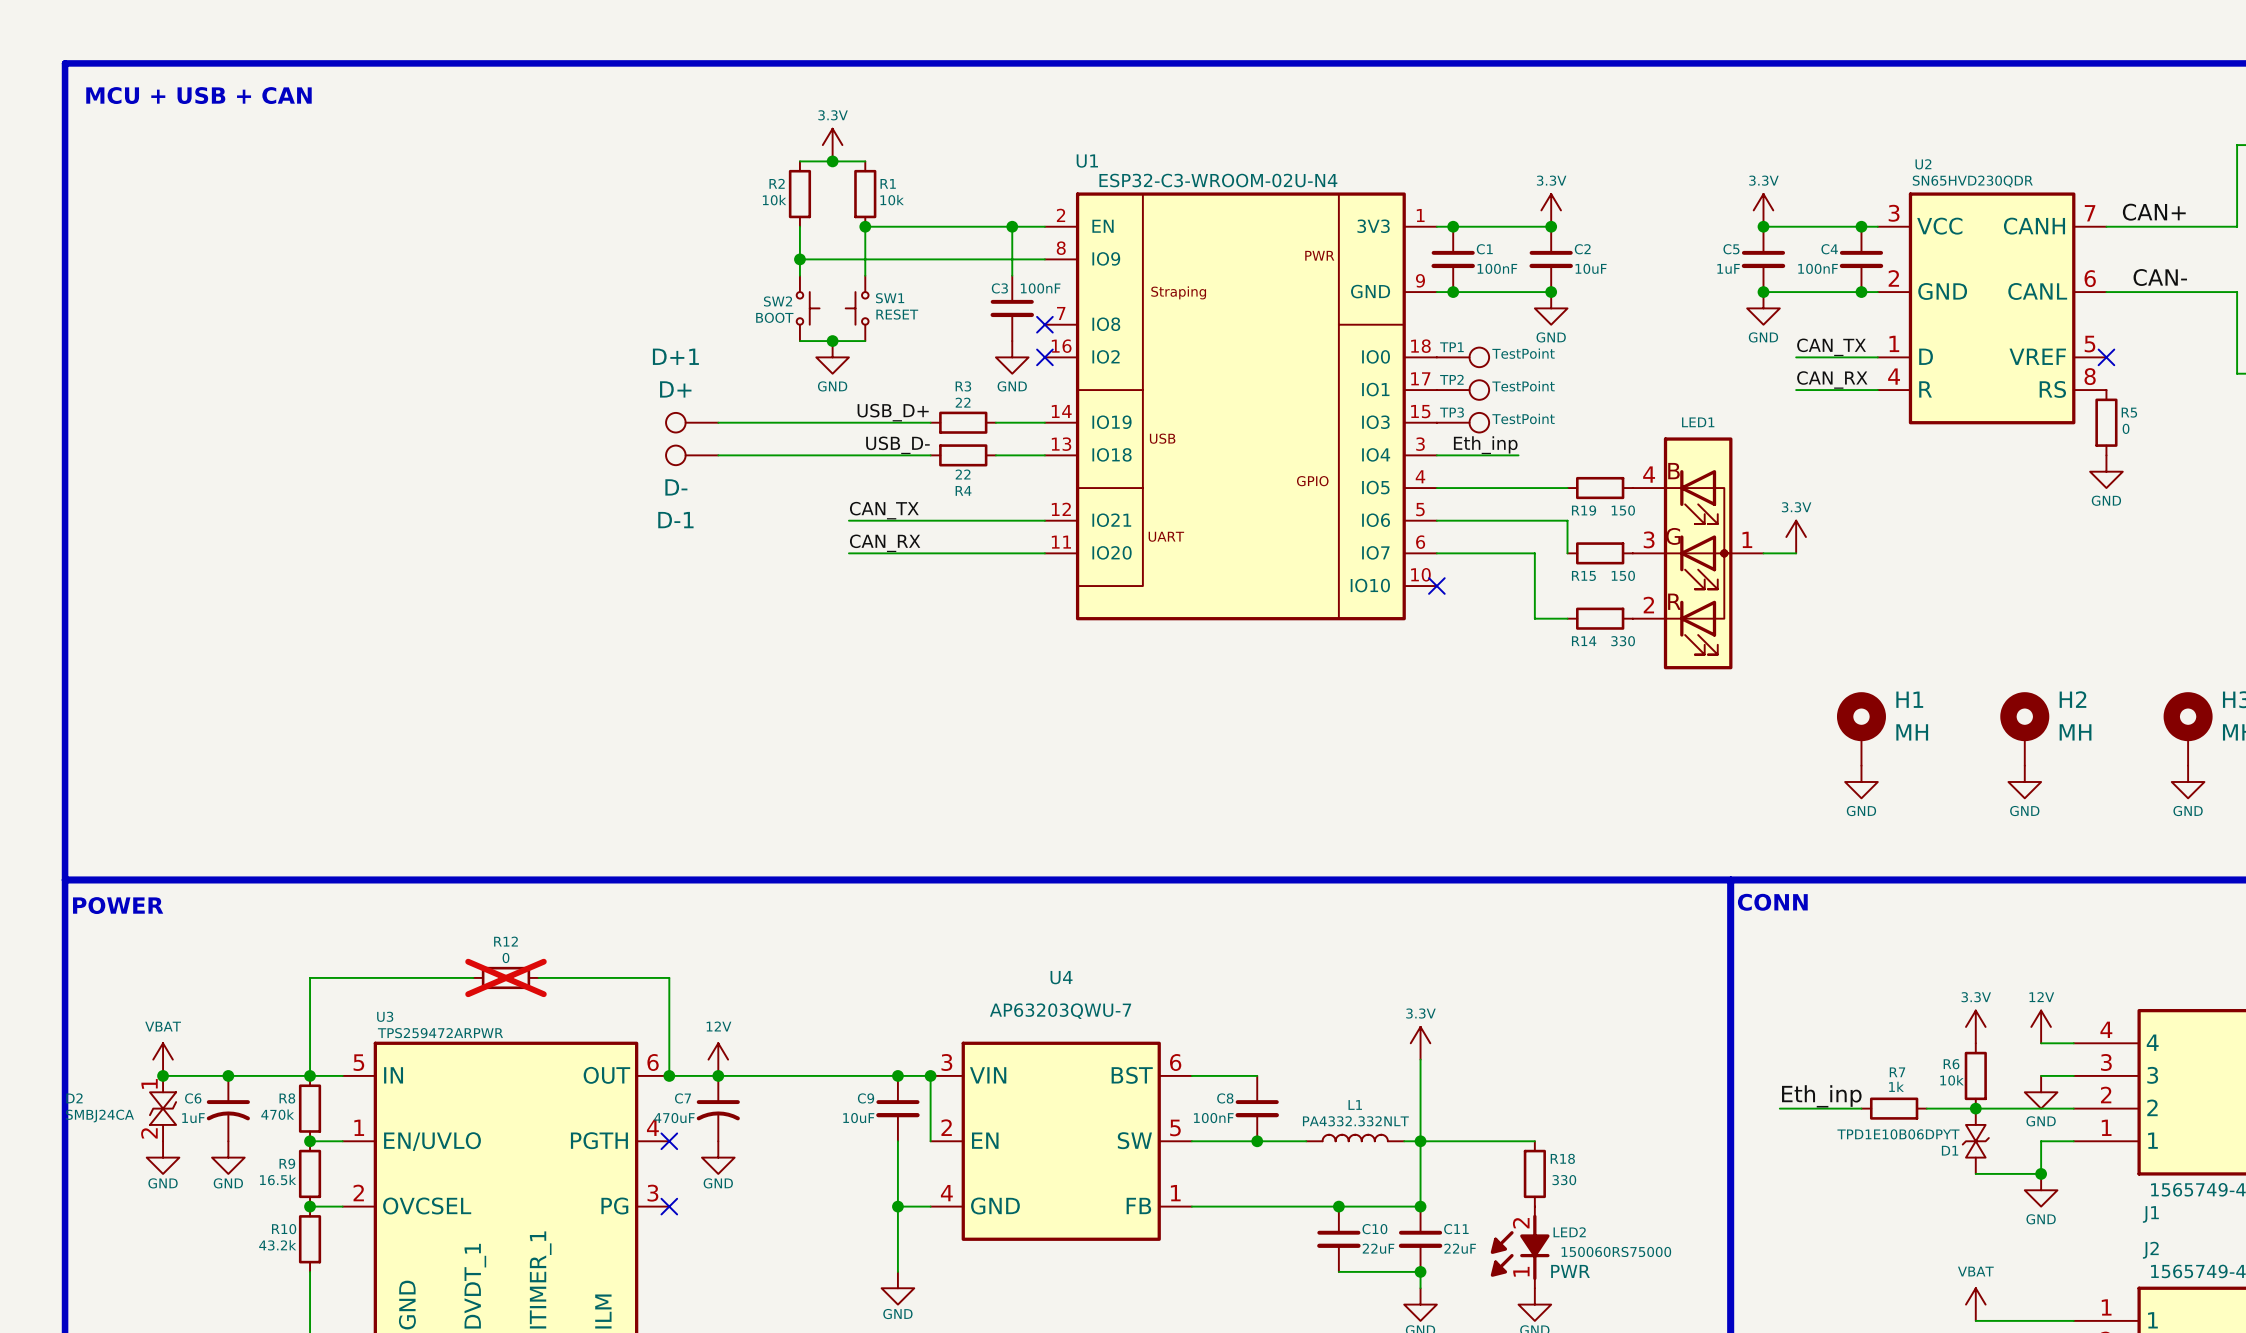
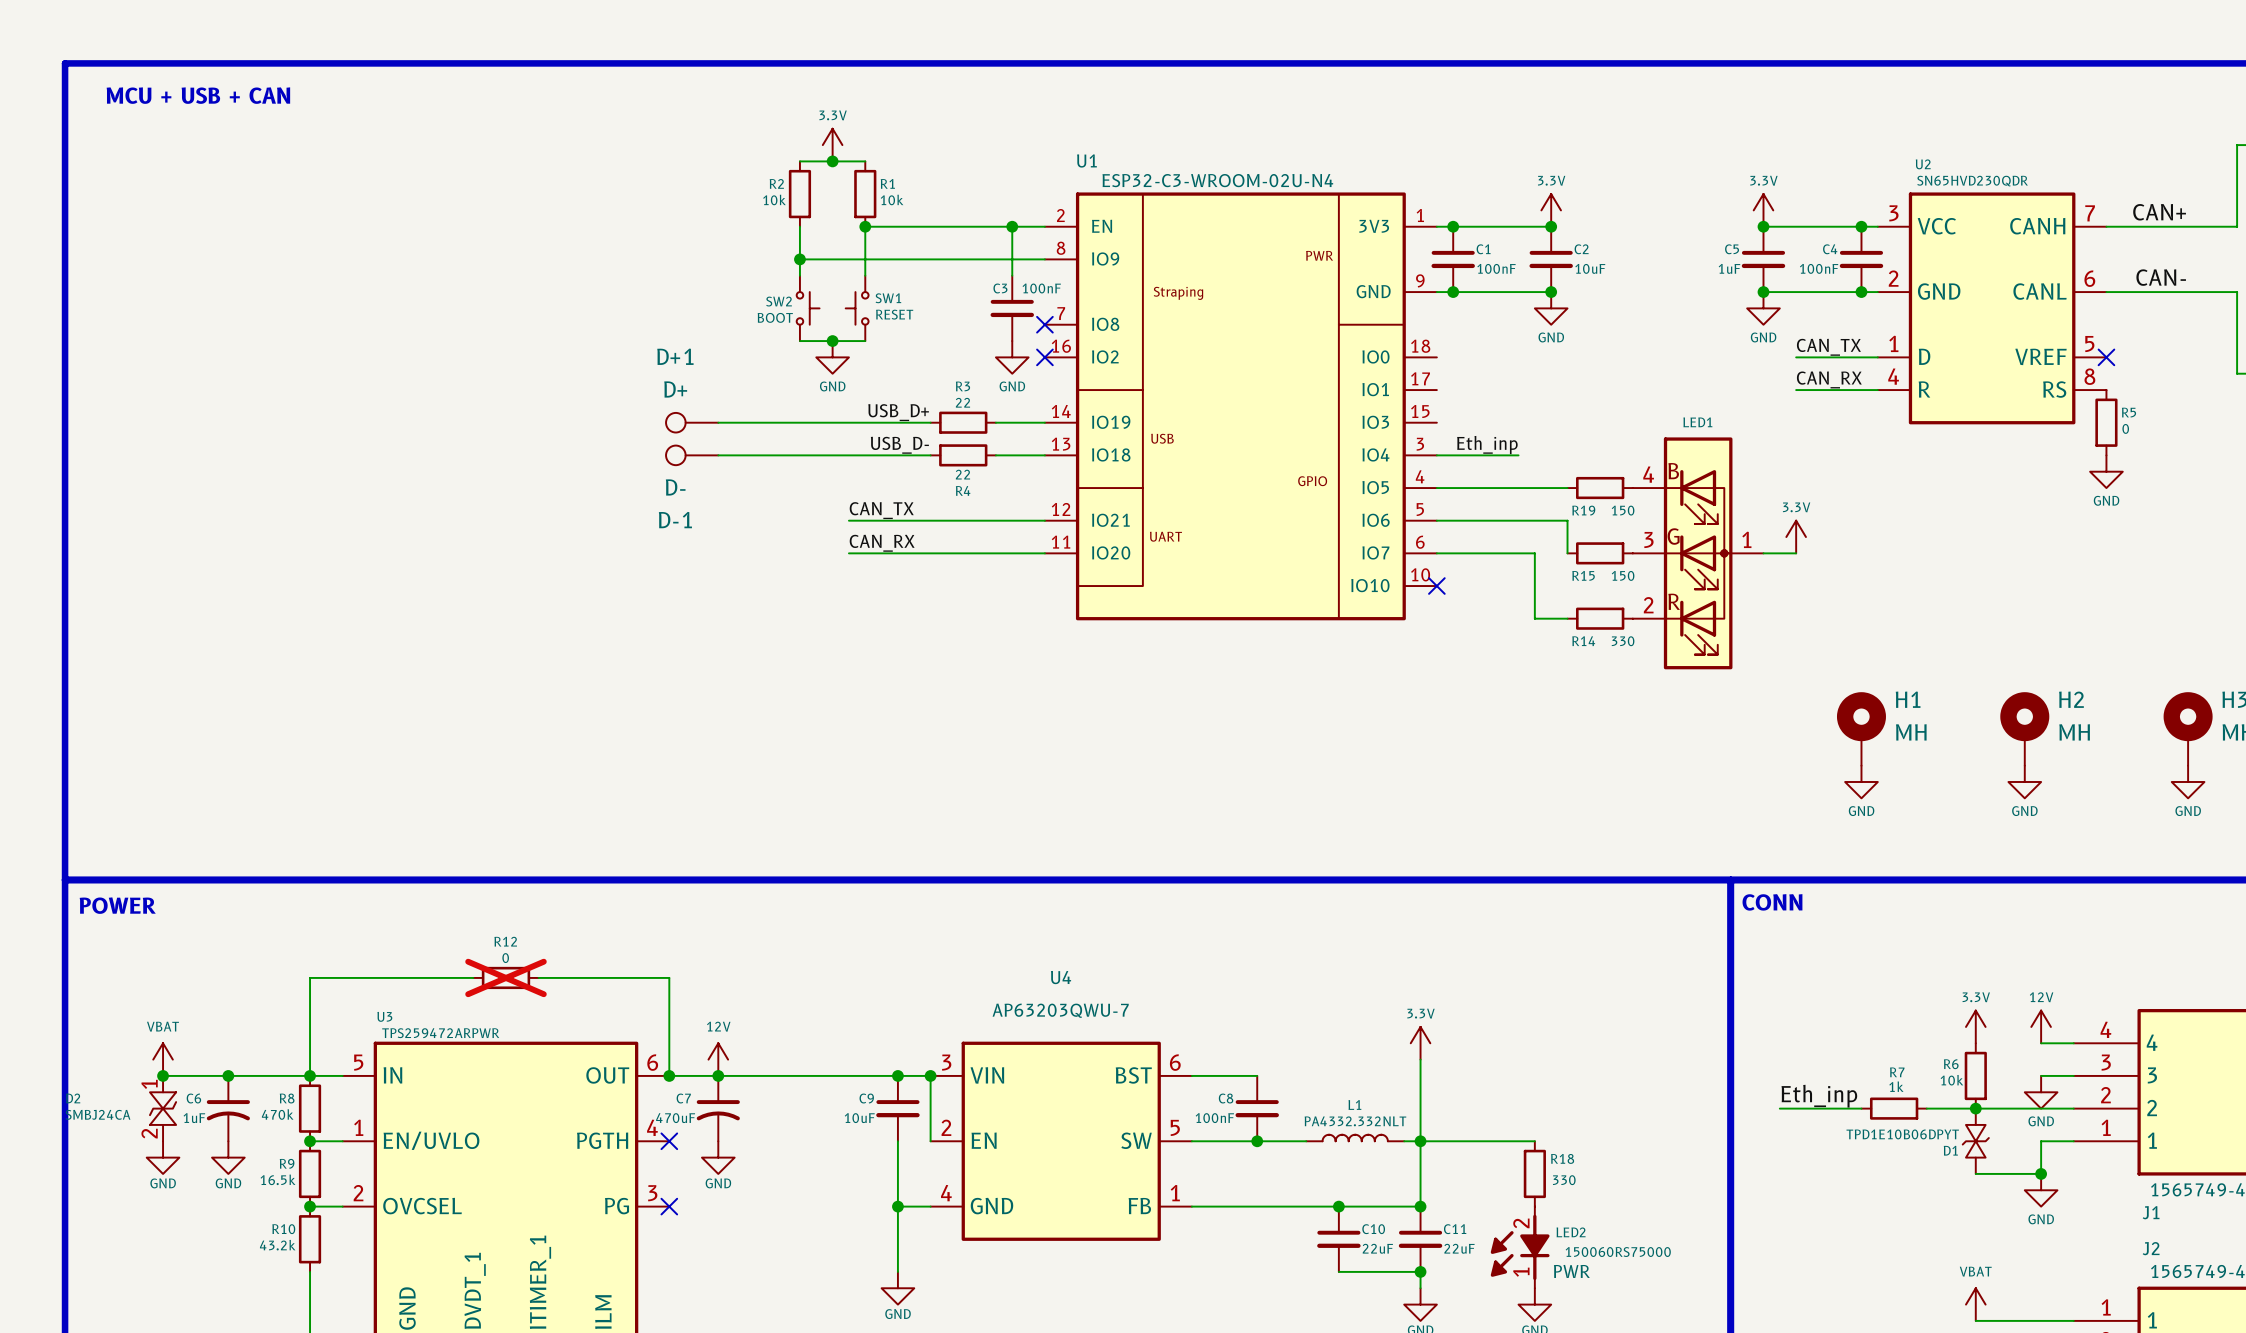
TP1: TestPoint (1463, 357) -> none
TP2: TestPoint (1463, 390) -> none
TP3: TestPoint (1463, 422) -> none

